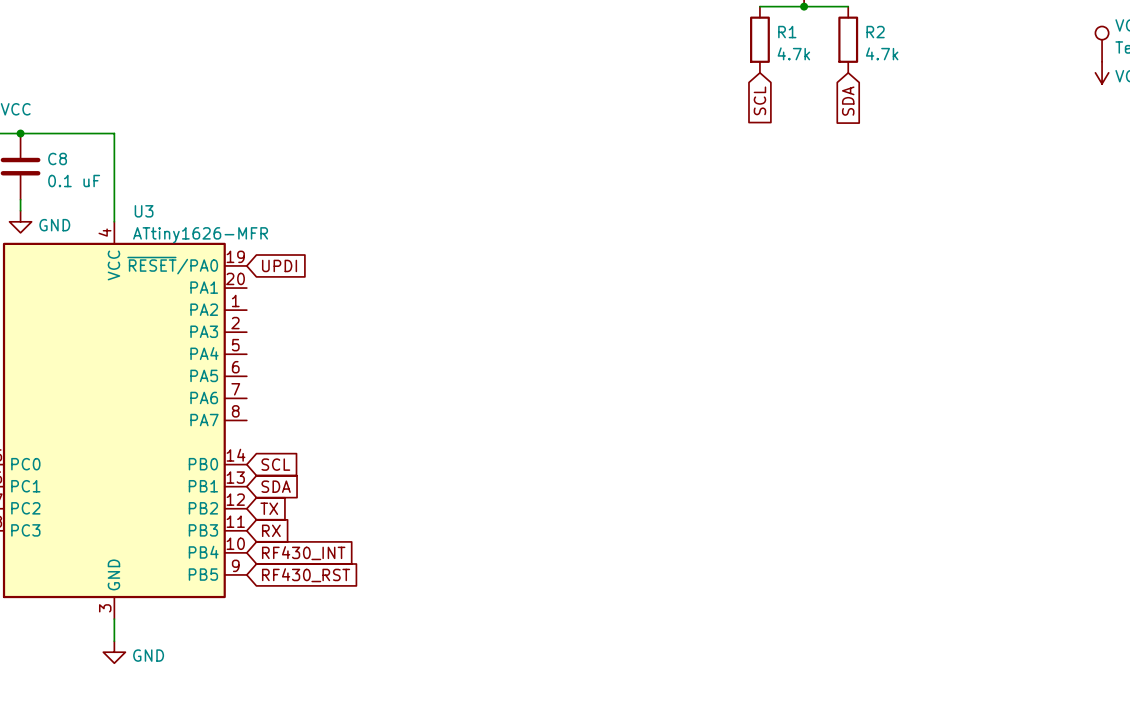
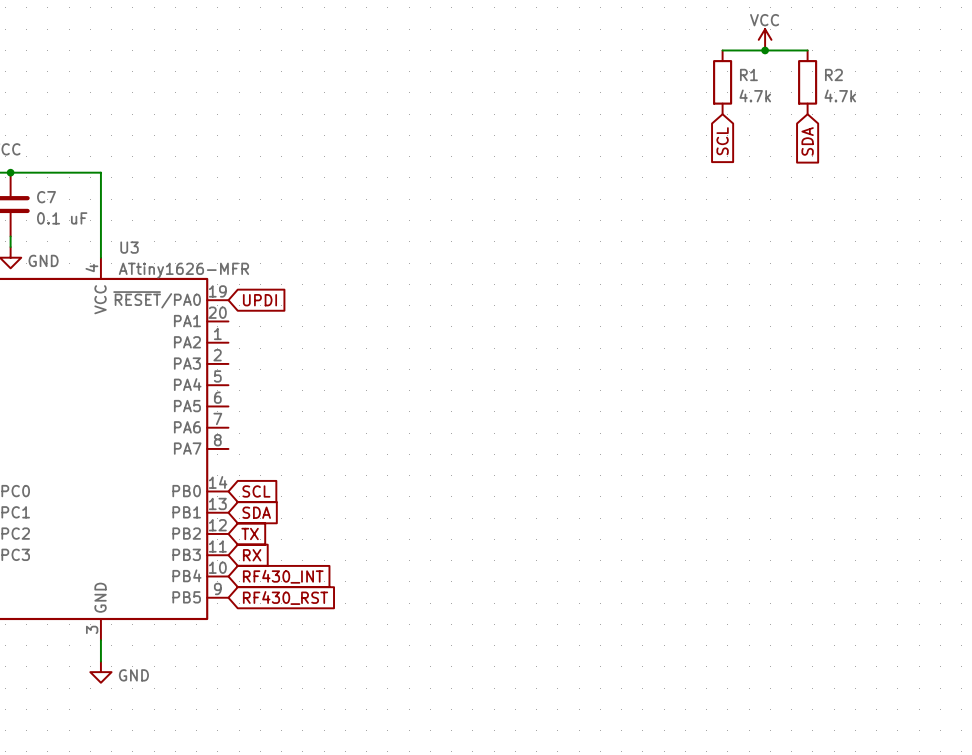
C8 name: C8 (57, 158) -> C7 (46, 197)

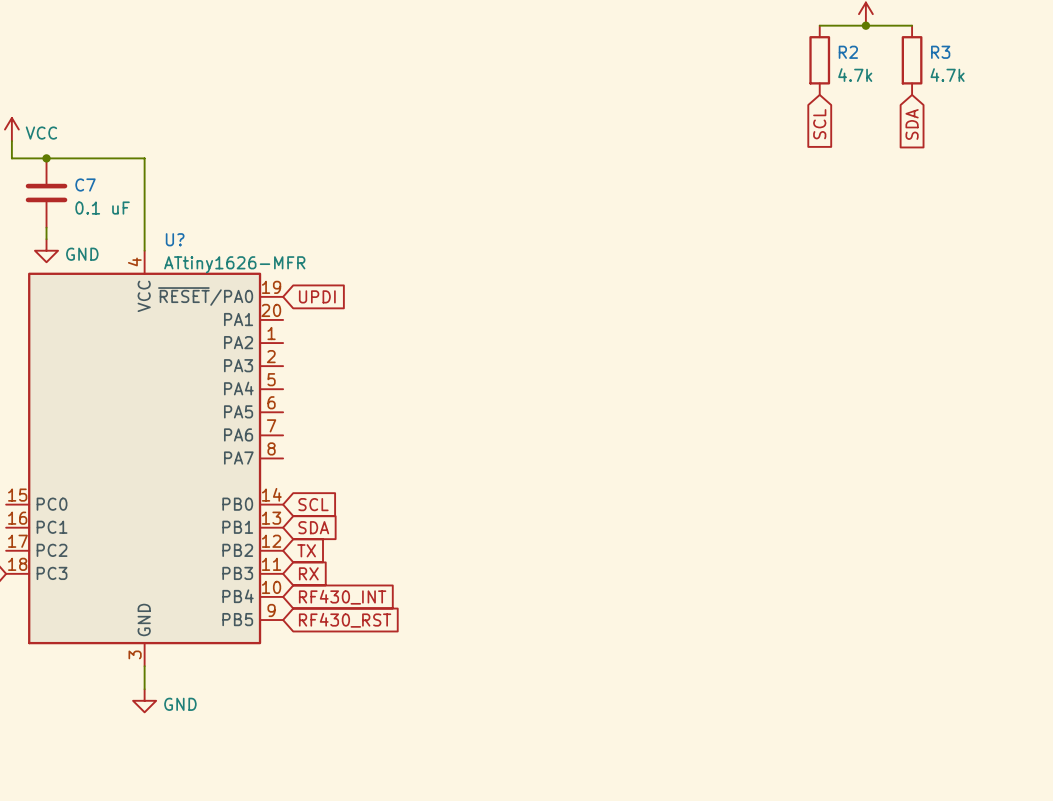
R1 name: R1 (748, 74) -> R2 (848, 52)
R2 name: R2 (833, 74) -> R3 (940, 52)
U3 name: U3 (129, 247) -> U? (175, 239)

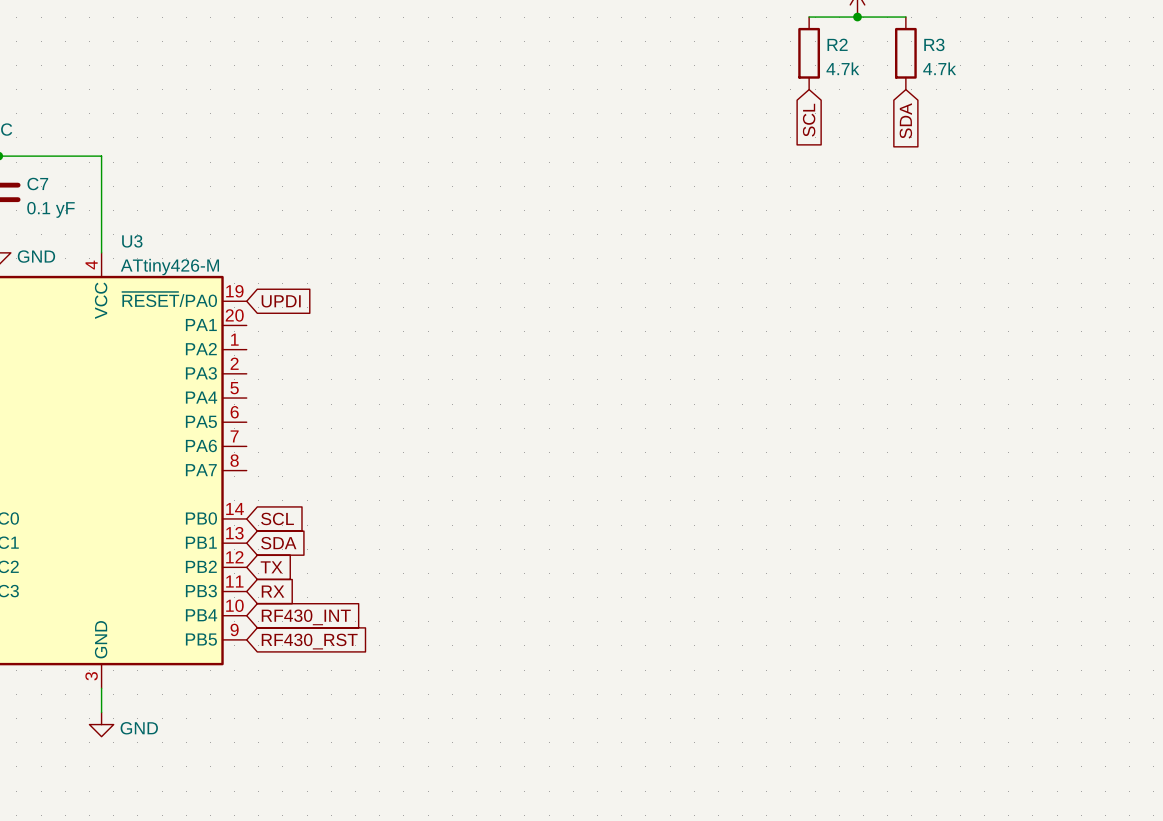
C7 value: 0.1 uF (102, 208) -> 0.1 yF (50, 209)
U? name: U? (175, 239) -> U3 (132, 241)
U? value: ATtiny1626-MFR (234, 264) -> ATtiny426-M (169, 267)

